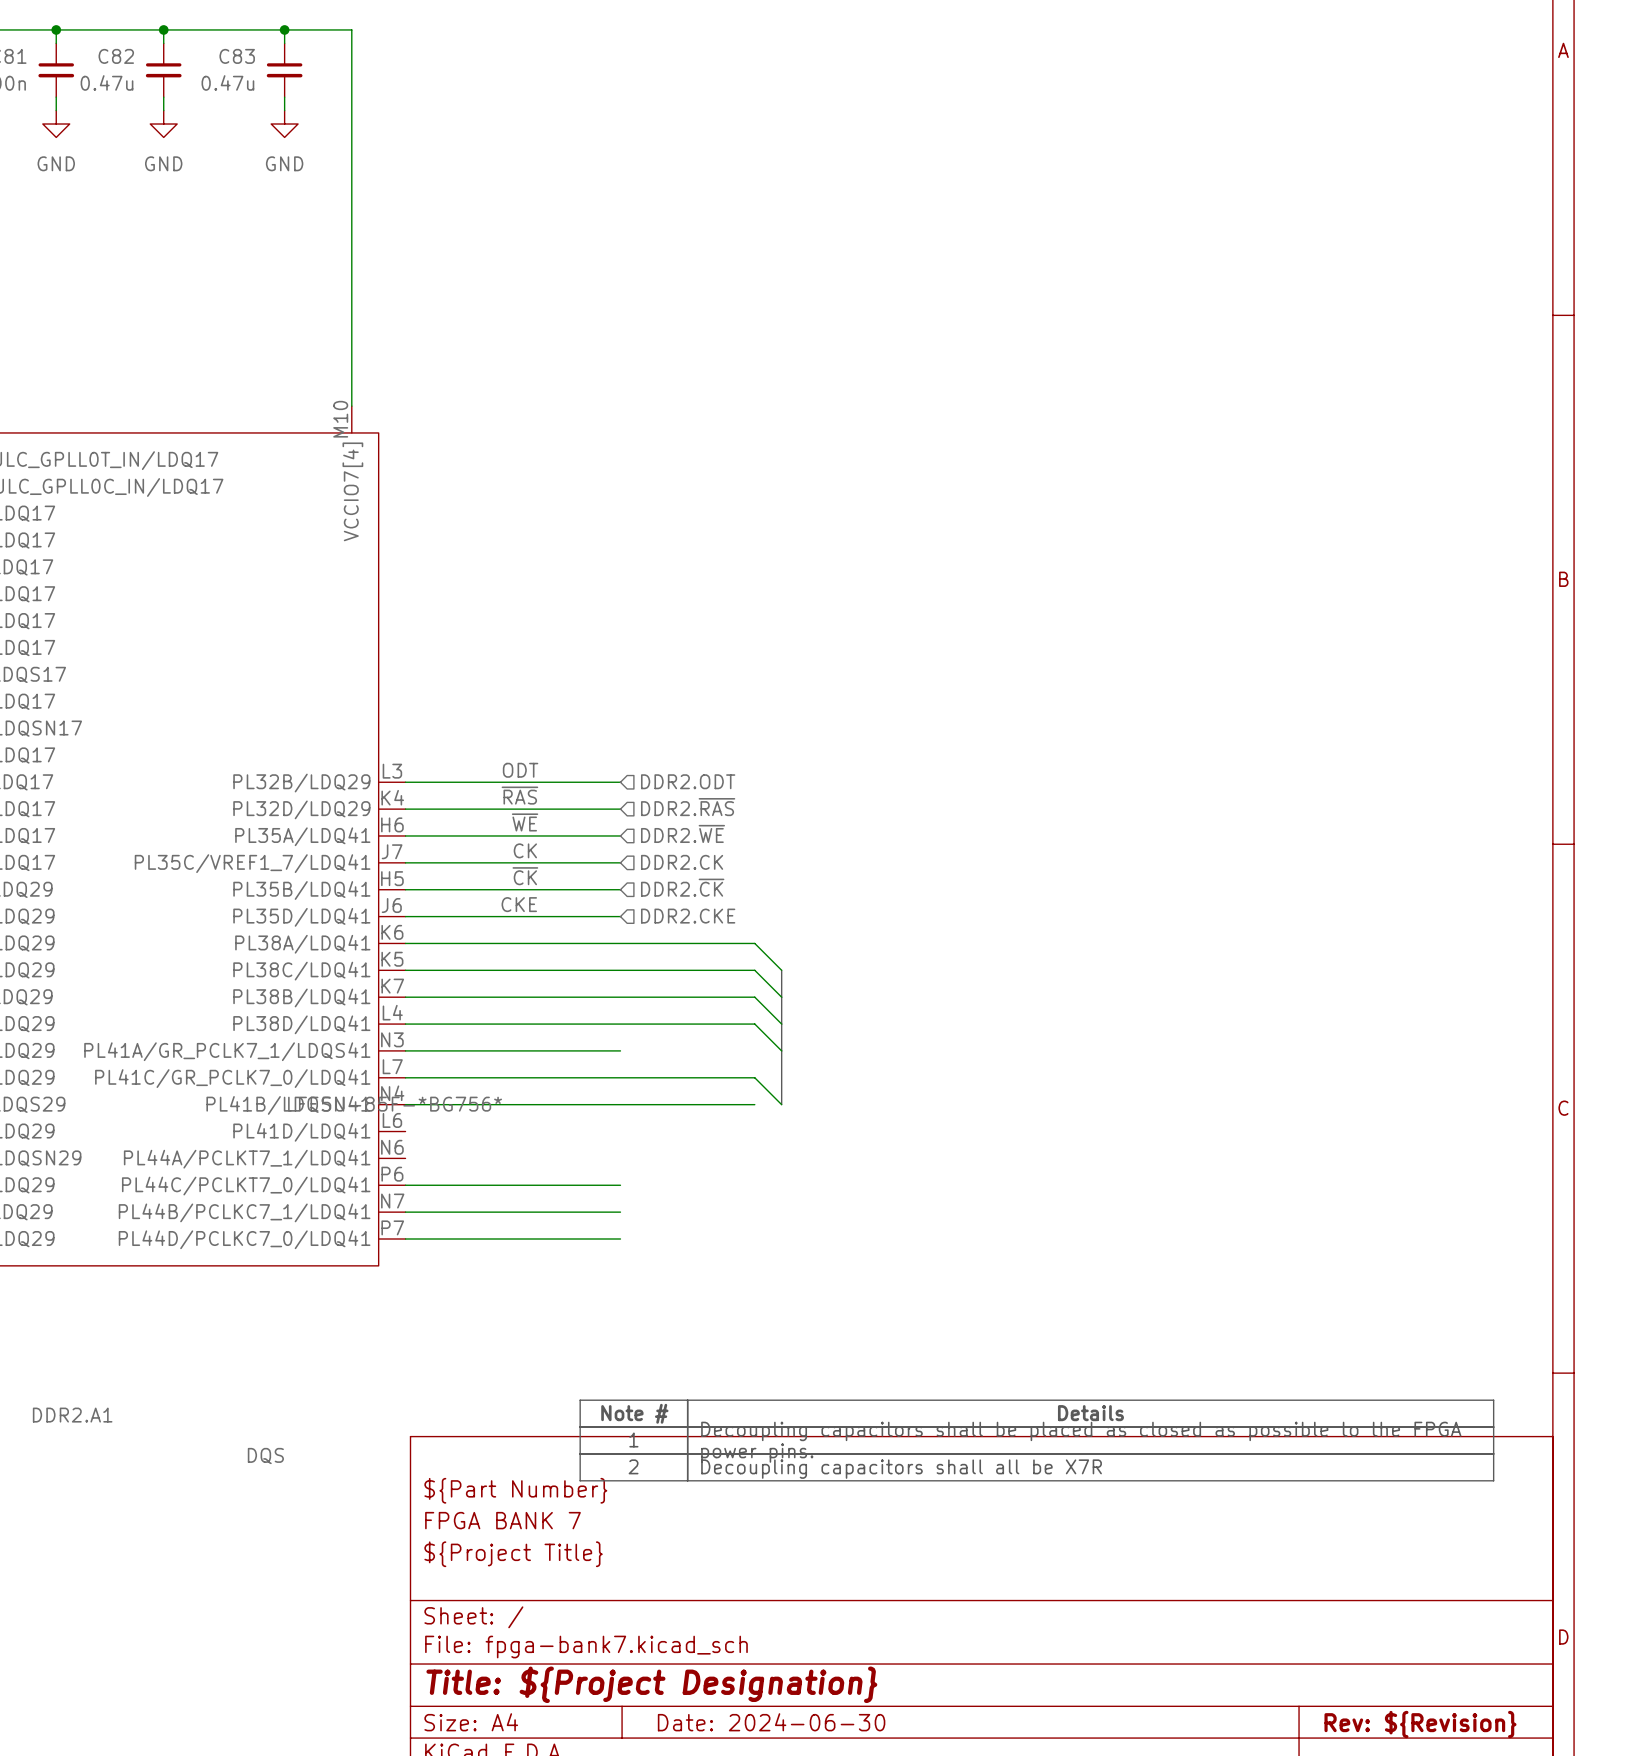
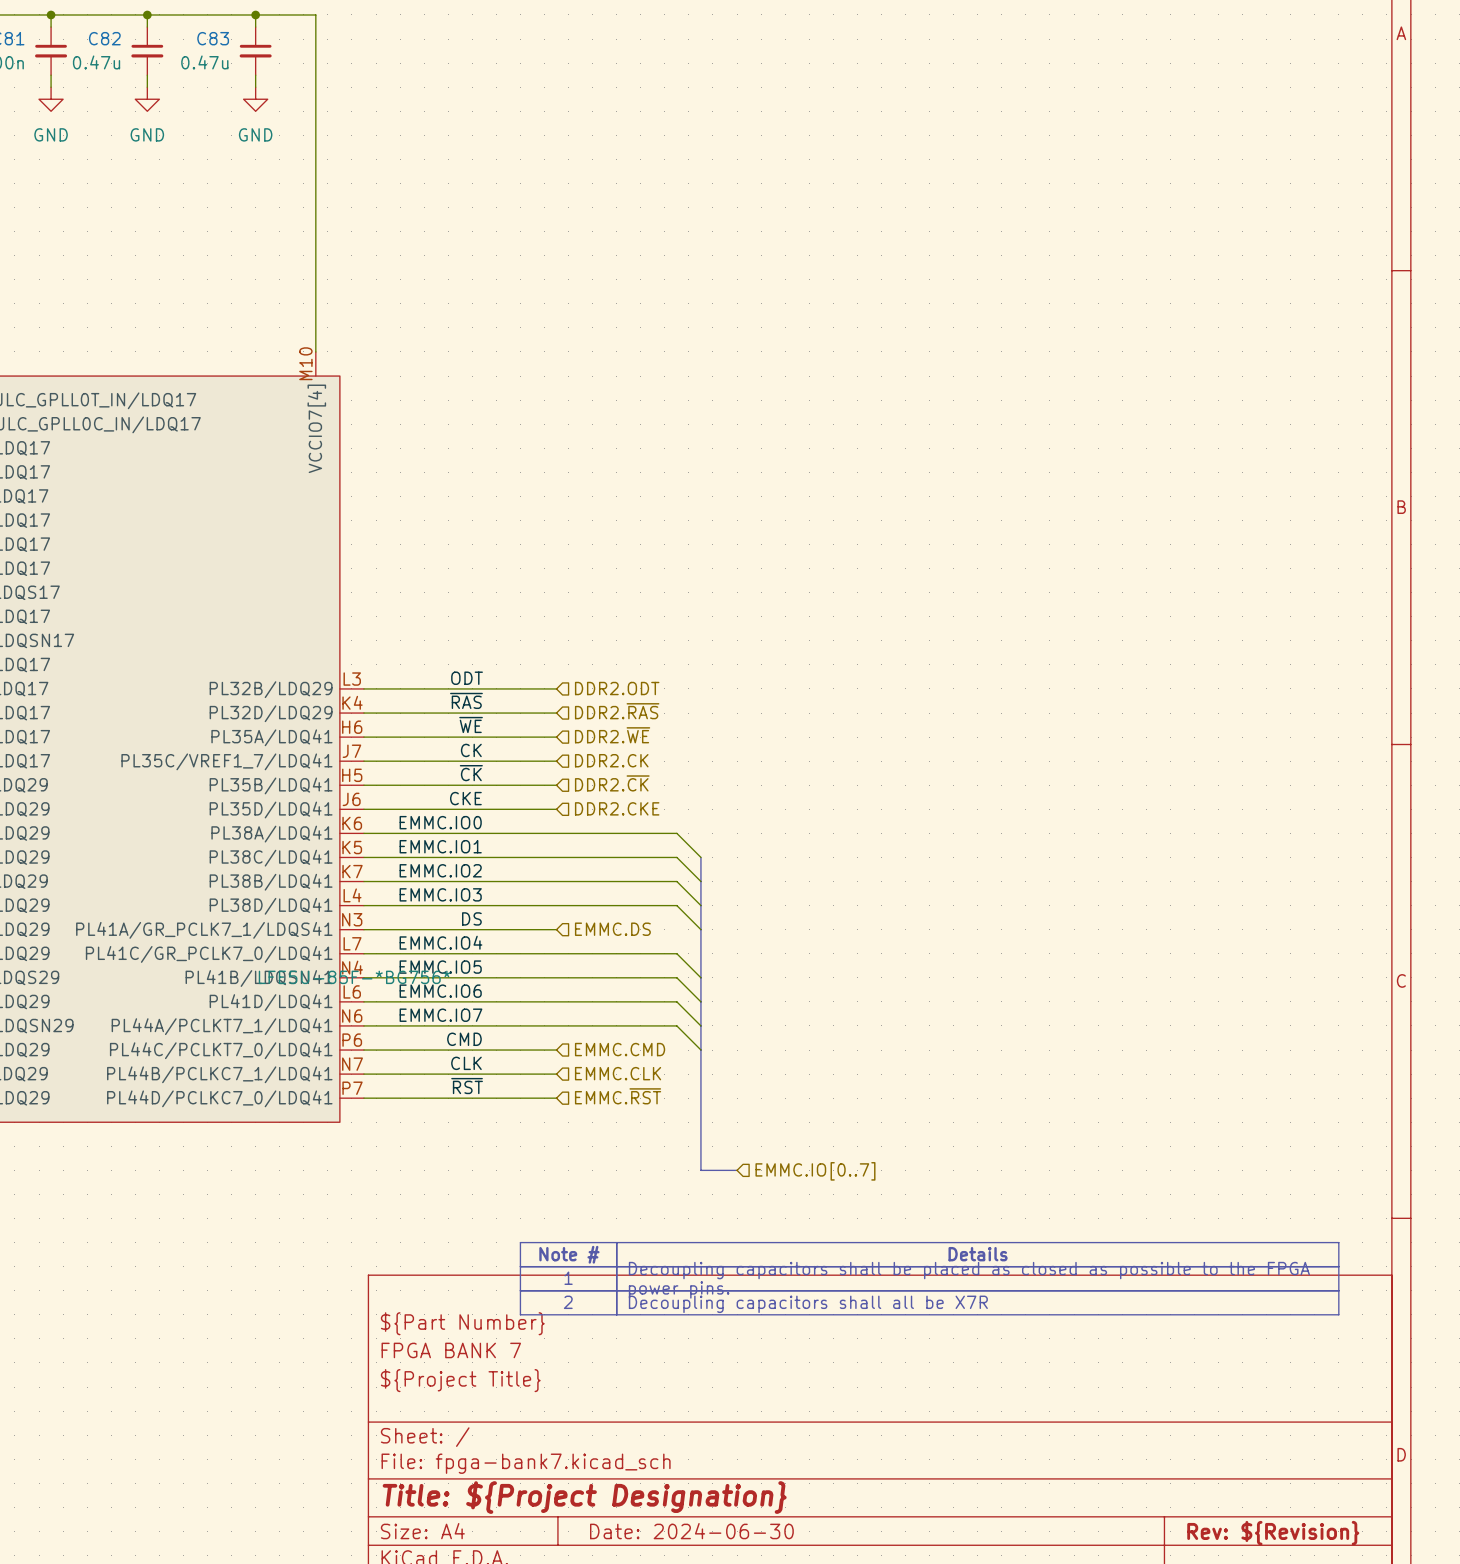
label: none -> EMMC.IO0 (440, 822)
label: none -> EMMC.IO1 (440, 846)
label: none -> EMMC.IO2 (440, 870)
label: none -> EMMC.IO3 (440, 894)
label: none -> DS (471, 918)
hierarchical label: none -> EMMC.DS (612, 929)
label: none -> EMMC.IO4 (440, 942)
label: none -> EMMC.IO5 (440, 967)
wire: none -> (676, 977) (700, 1001)
bus: none -> (700, 977) (700, 1170) (737, 1170)
label: none -> EMMC.IO6 (440, 991)
wire: none -> (363, 1001) (676, 1001) (700, 1025)
label: none -> EMMC.IO7 (440, 1015)
wire: none -> (363, 1025) (676, 1025) (700, 1050)
label: none -> CMD (464, 1039)
hierarchical label: none -> EMMC.CMD (620, 1049)
label: none -> CLK (466, 1063)
hierarchical label: none -> EMMC.CLK (618, 1073)
label: none -> ~{RST} (467, 1086)
hierarchical label: none -> EMMC.~{RST} (618, 1096)
hierarchical label: none -> EMMC.IO[0..7] (815, 1171)
label: DDR2.A1 (72, 1415) -> none
label: DQS (265, 1456) -> none

